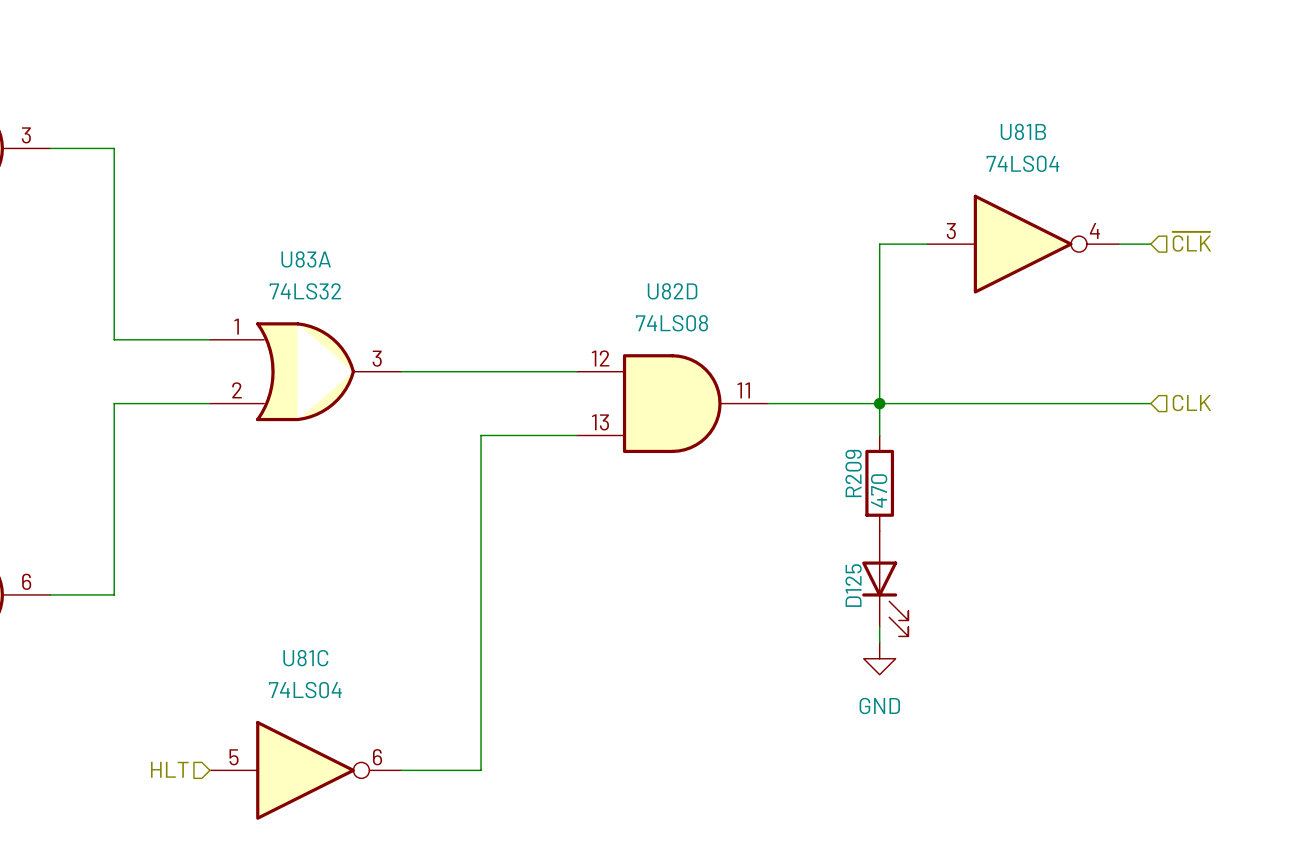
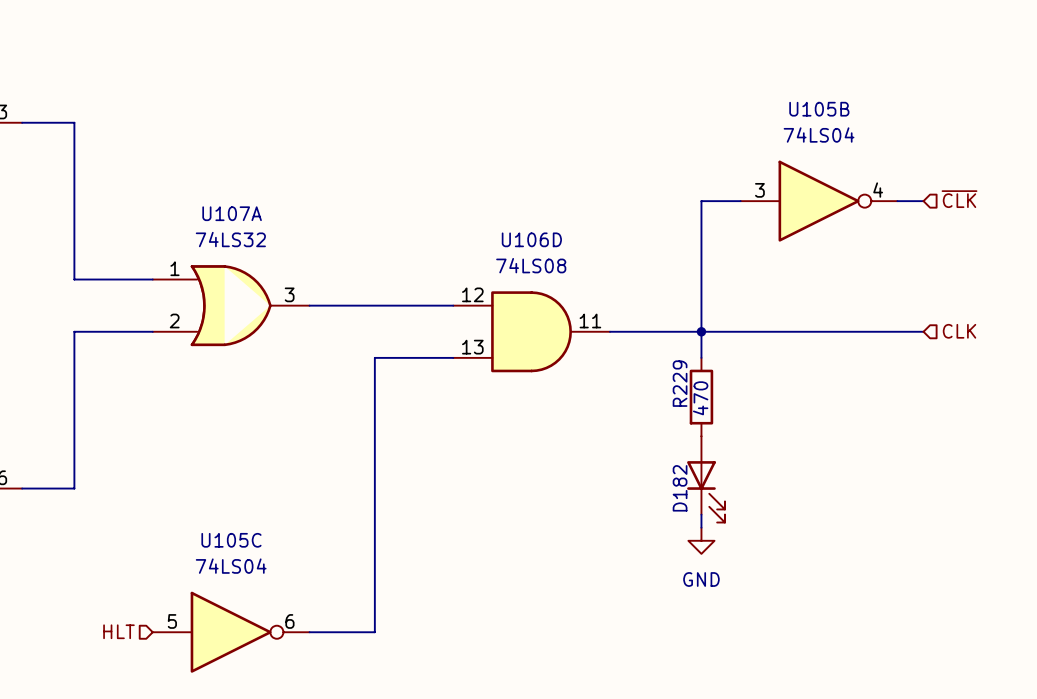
U81B name: U81B (1023, 131) -> U105B (819, 109)
U83A name: U83A (306, 259) -> U107A (232, 213)
U82D name: U82D (672, 291) -> U106D (531, 239)
R209 name: R209 (853, 473) -> R229 (680, 383)
D125 name: D125 (853, 585) -> D182 (680, 488)
U81C name: U81C (305, 658) -> U105C (231, 540)

